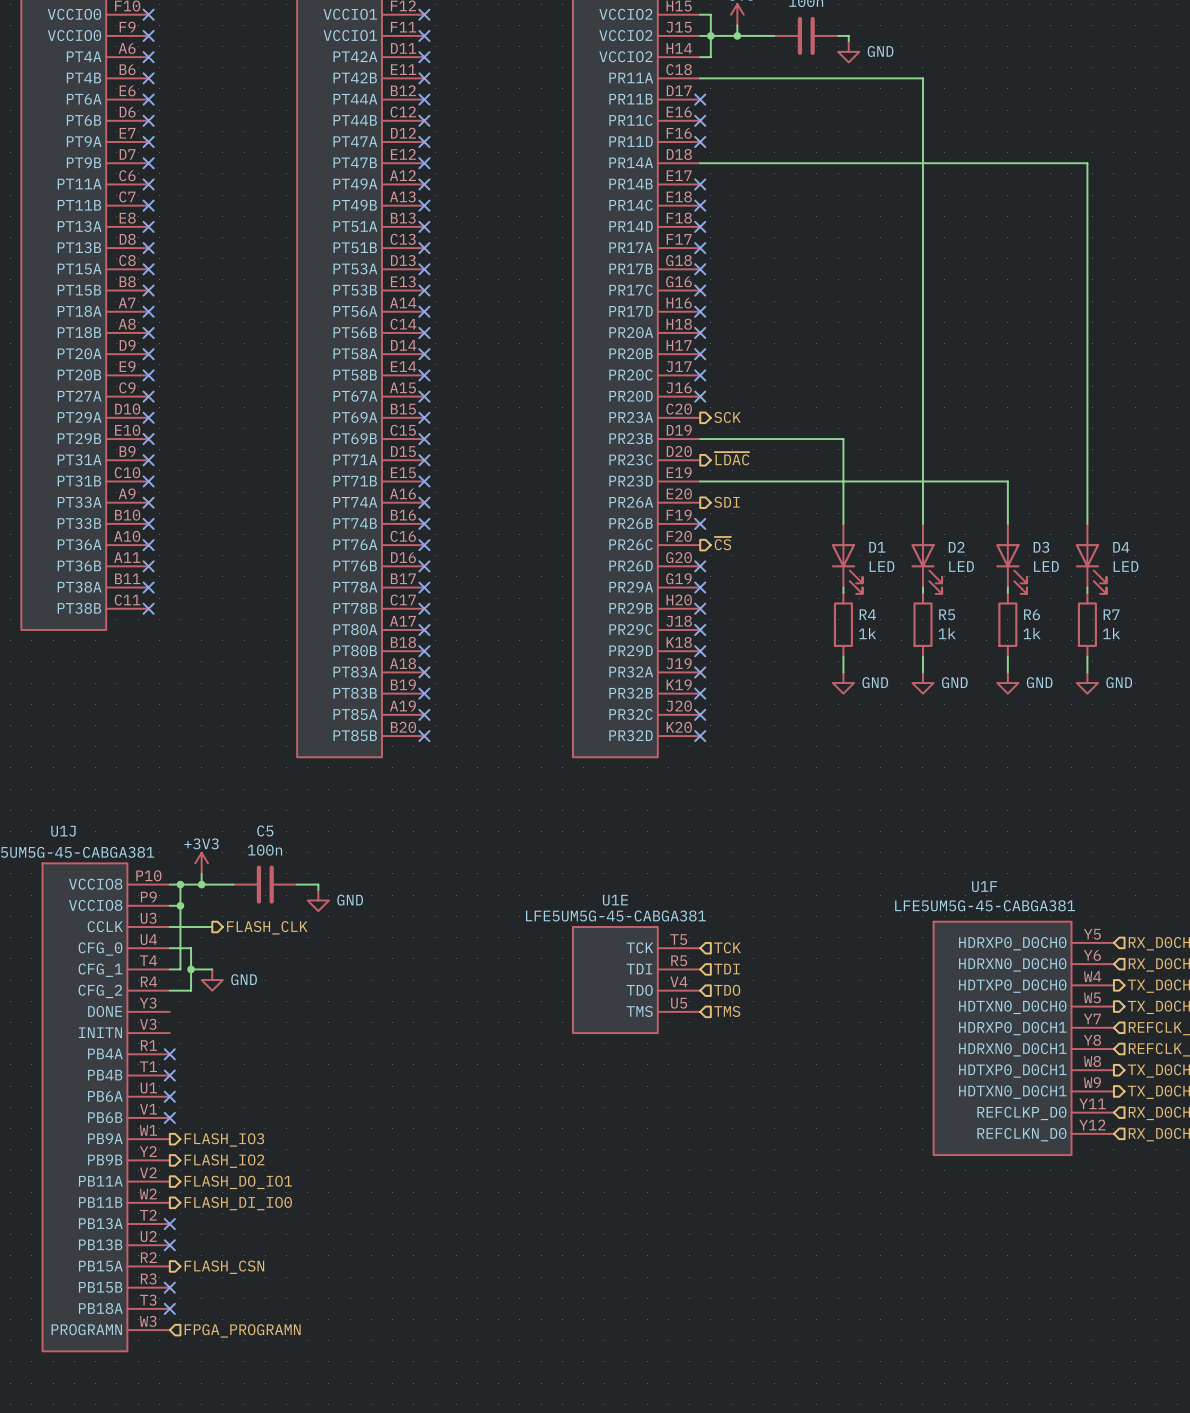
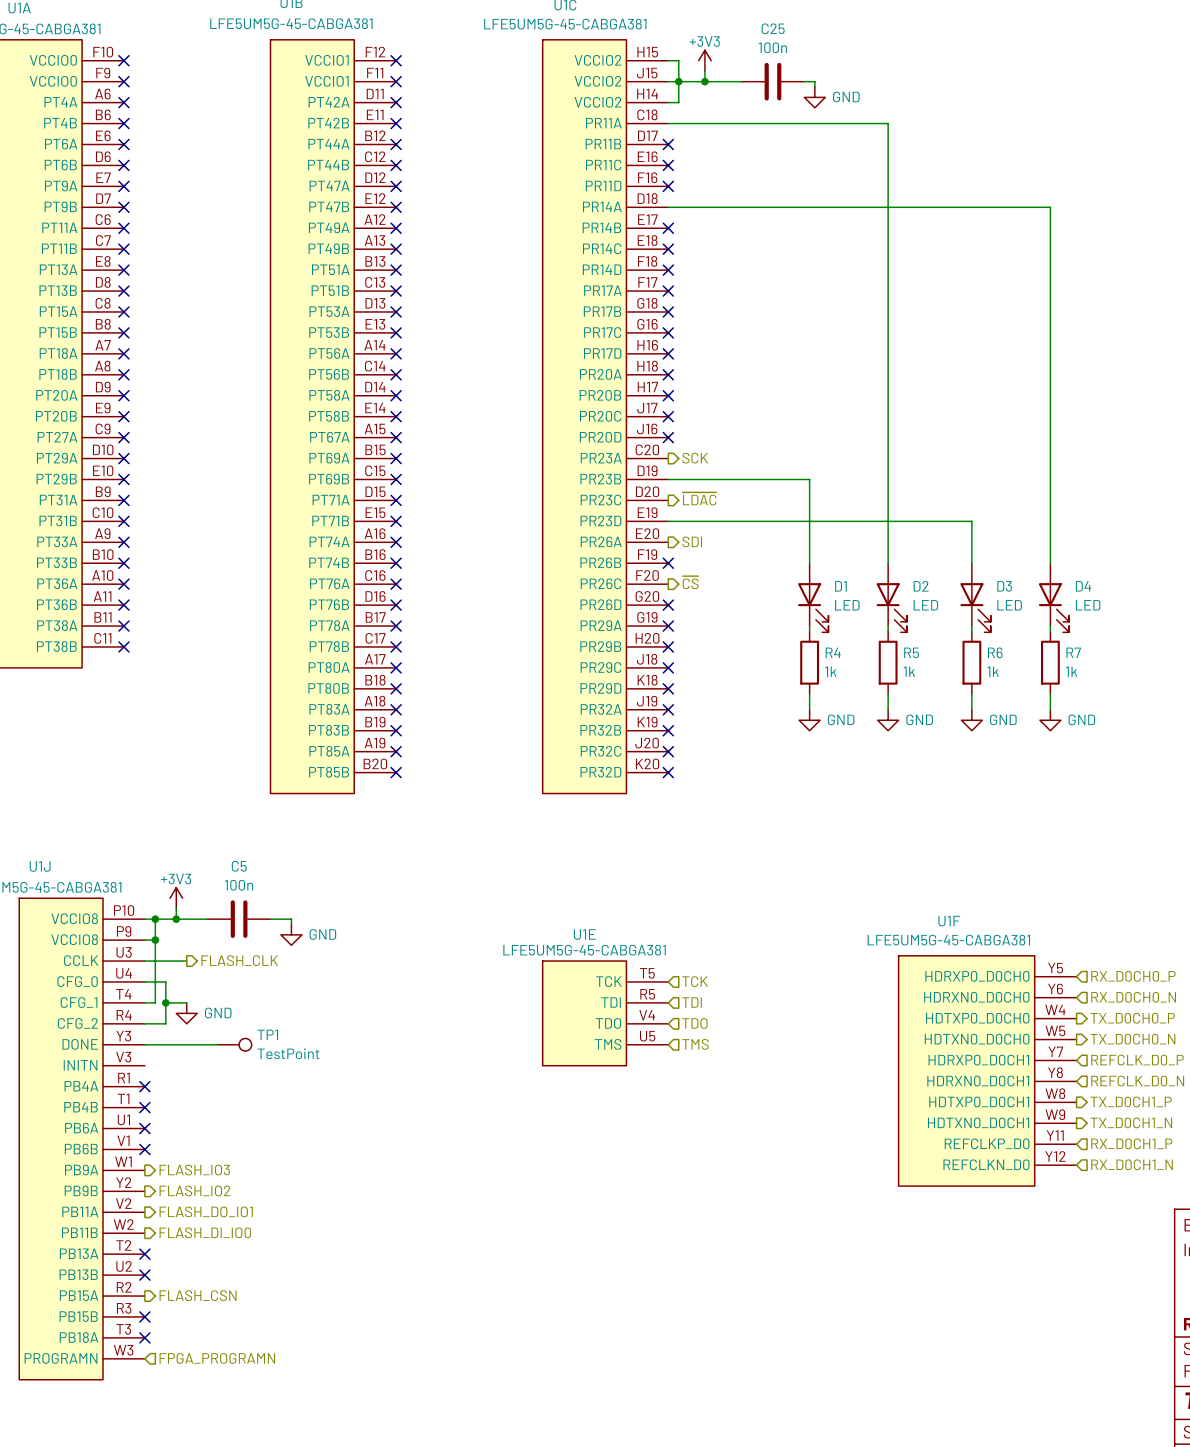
wire: none -> (144, 1044) (218, 1044)
TP1: none -> TestPoint (234, 1044)

